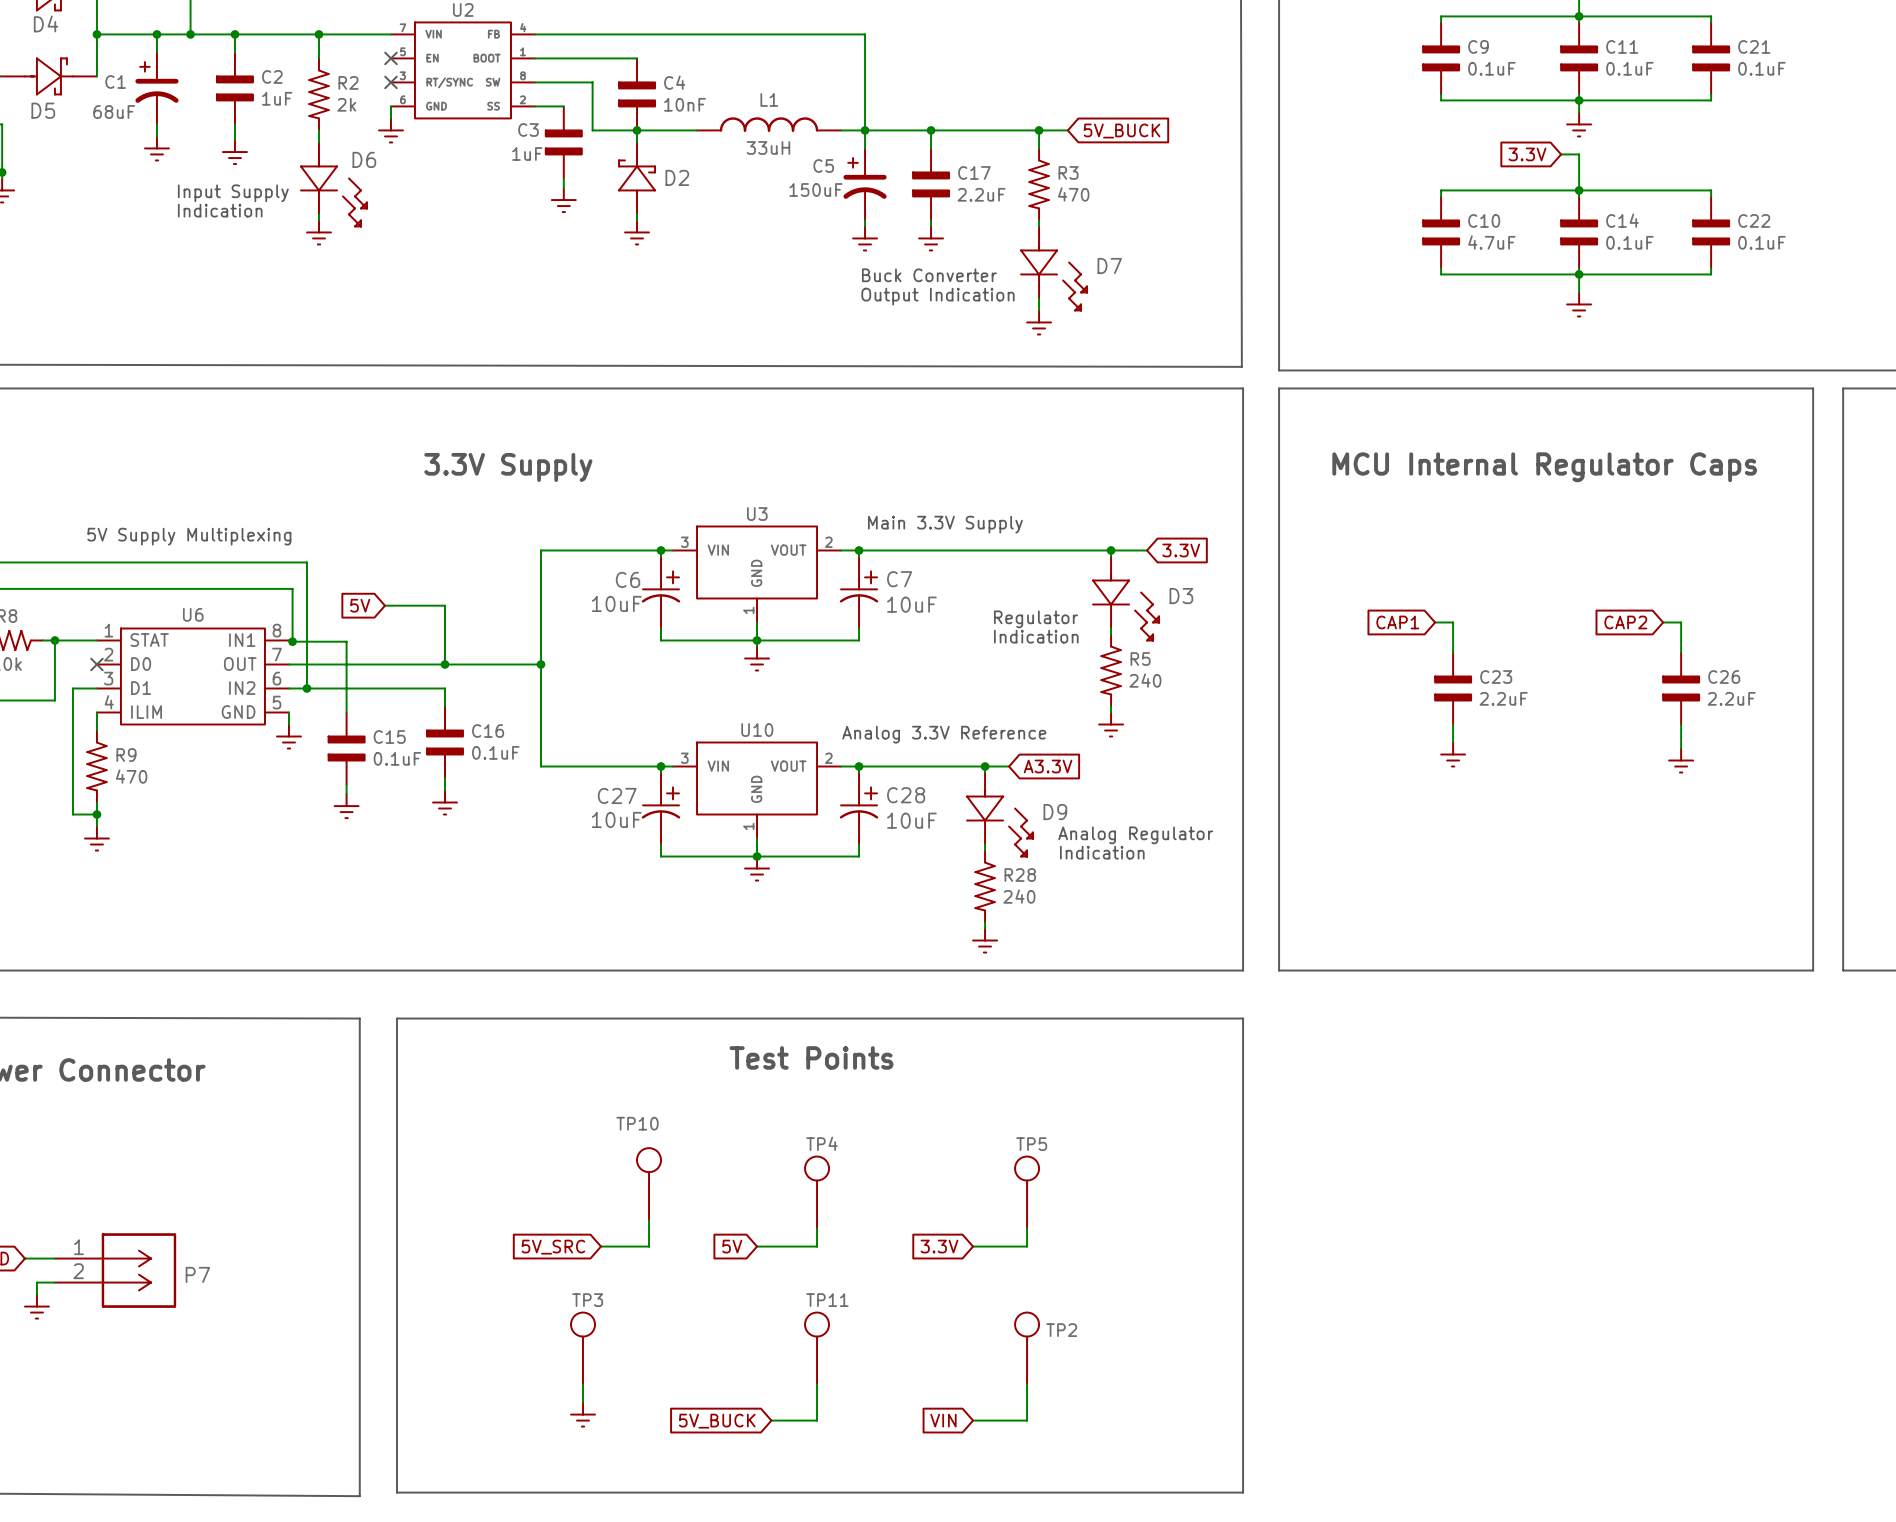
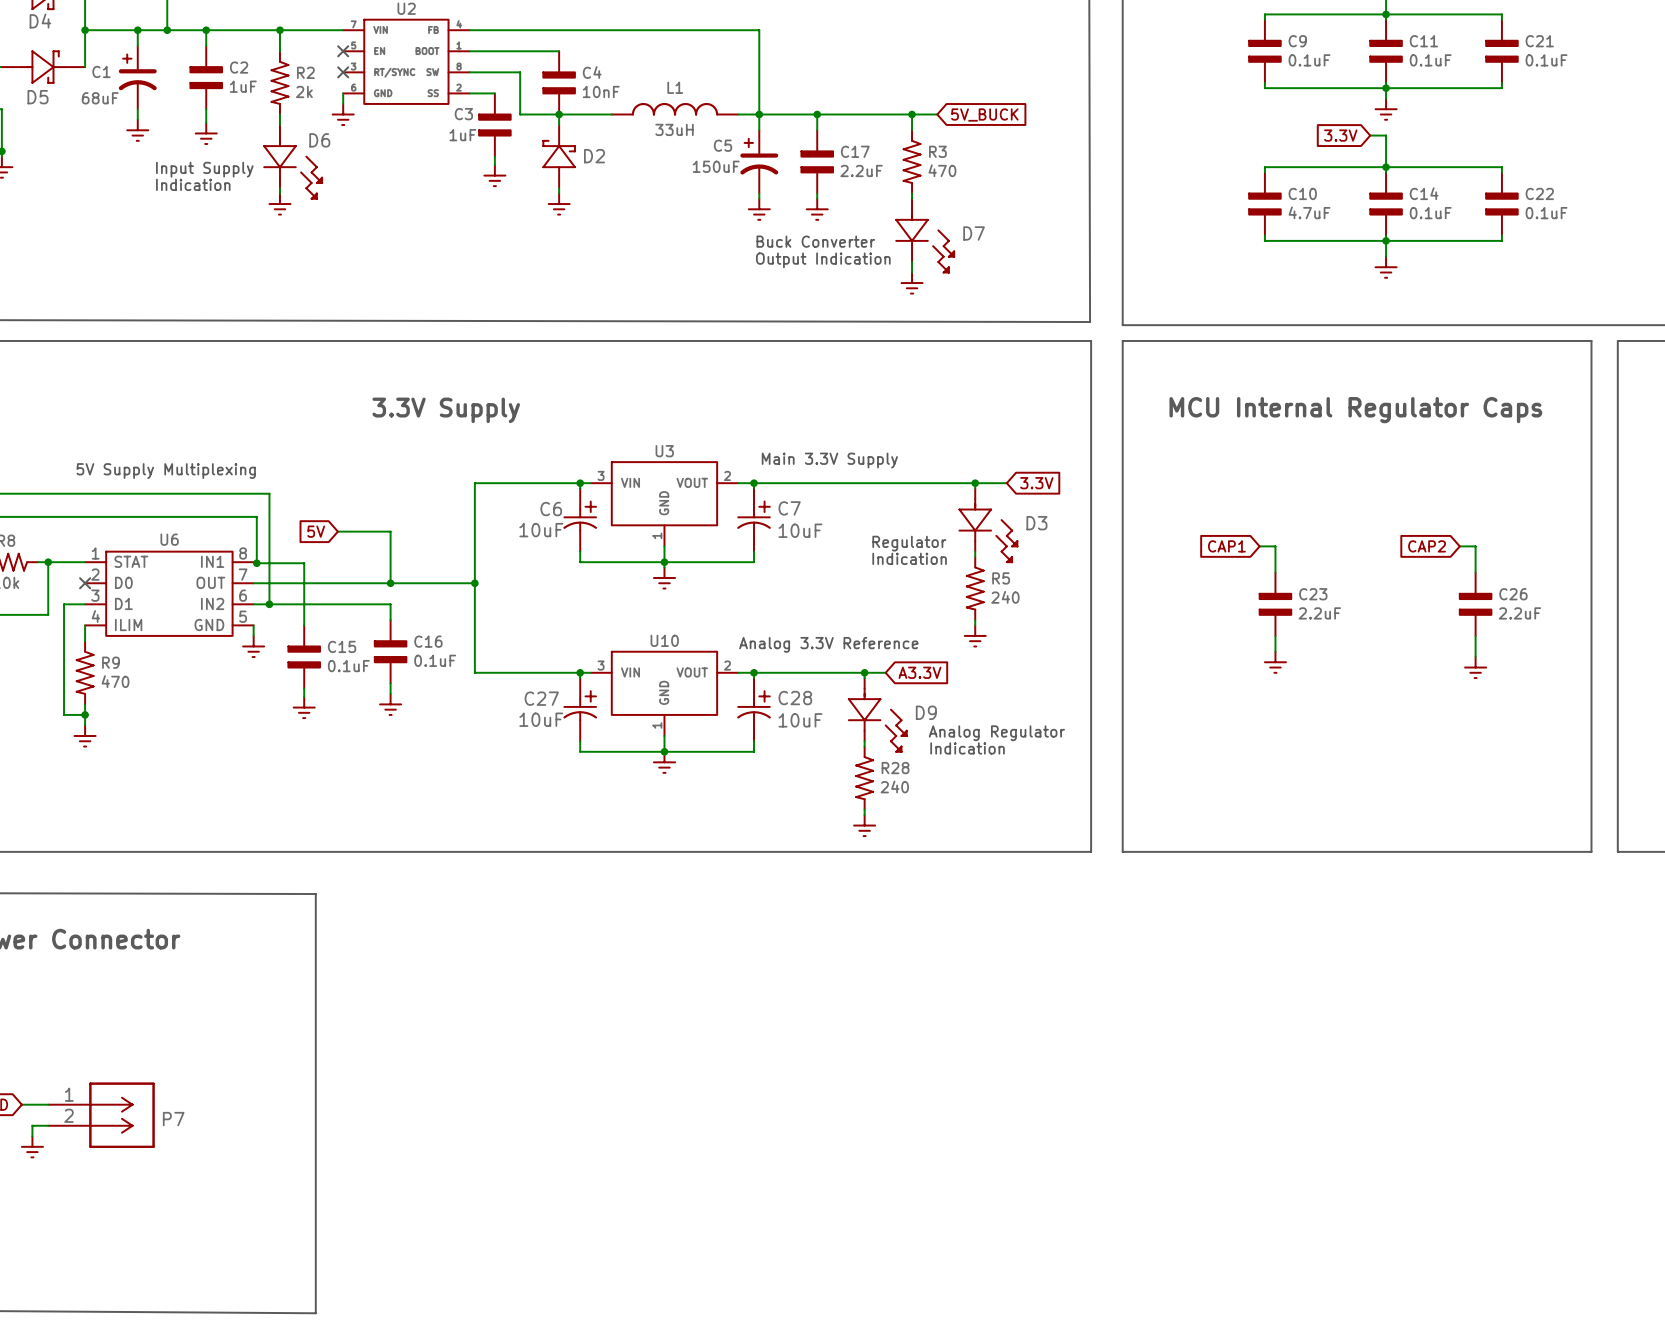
line: (396, 1018) (396, 1492) (1243, 1492) (1243, 1018) (396, 1018) -> none
text: Test Points (811, 1057) -> none
TP10: (649, 1184) -> none
TP4: (817, 1192) -> none
TP5: (1027, 1192) -> none
wire: (649, 1220) (649, 1246) (601, 1246) -> none
wire: (817, 1228) (817, 1246) (757, 1246) -> none
wire: (1027, 1228) (1027, 1246) (973, 1246) -> none
global label: 5V (732, 1246) -> none
global label: 3.3V (939, 1246) -> none
global label: 5V_SRC (553, 1247) -> none
TP3: (583, 1348) -> none
TP11: (817, 1348) -> none
TP2: (1027, 1348) -> none
wire: (583, 1384) (583, 1402) -> none
wire: (817, 1384) (817, 1420) (771, 1420) -> none
wire: (1027, 1384) (1027, 1420) (973, 1420) -> none
power symbol: (583, 1414) -> none
global label: VIN (943, 1420) -> none
global label: 5V_BUCK (717, 1421) -> none

